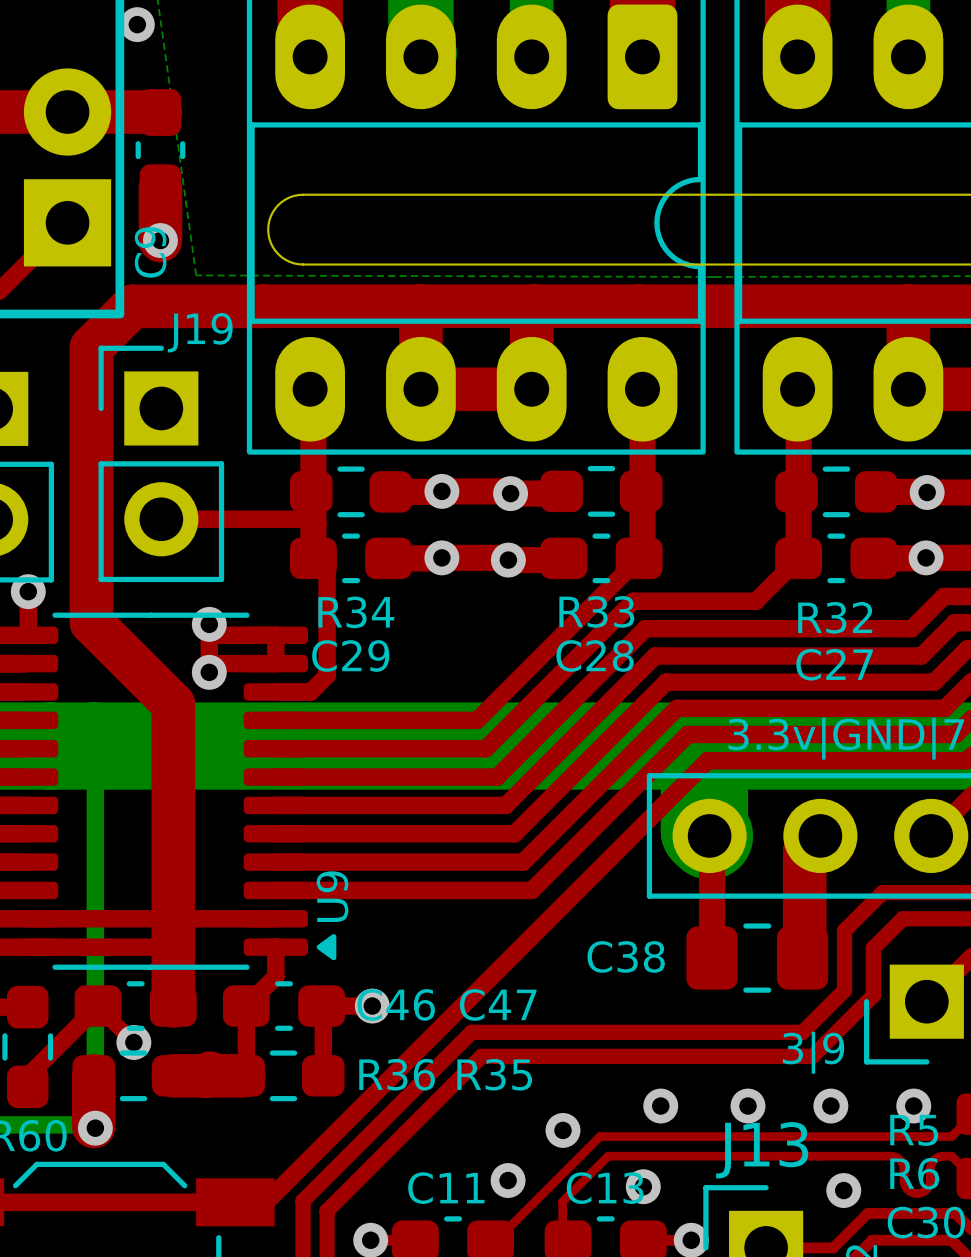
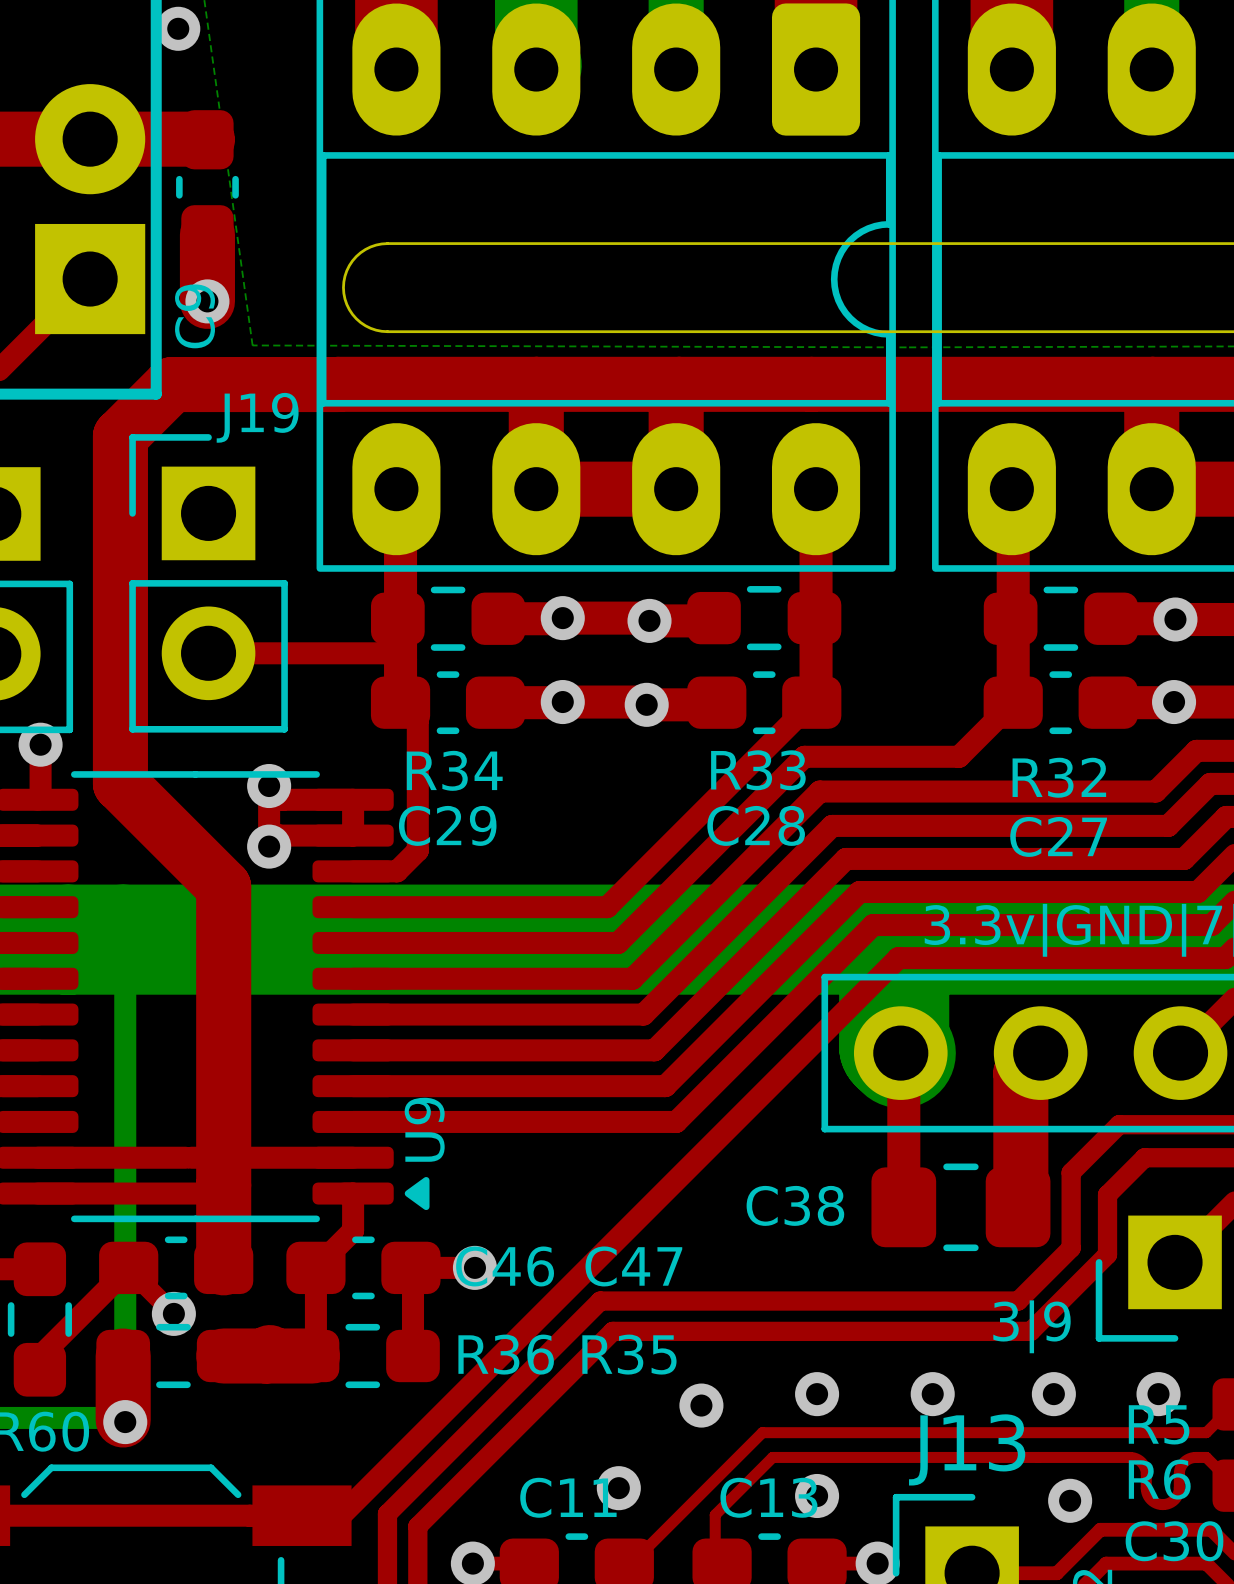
via position: (660, 1106) -> (817, 1394)
via position: (748, 1106) -> (932, 1394)
via position: (562, 1130) -> (701, 1405)
via position: (508, 1180) -> (618, 1488)

